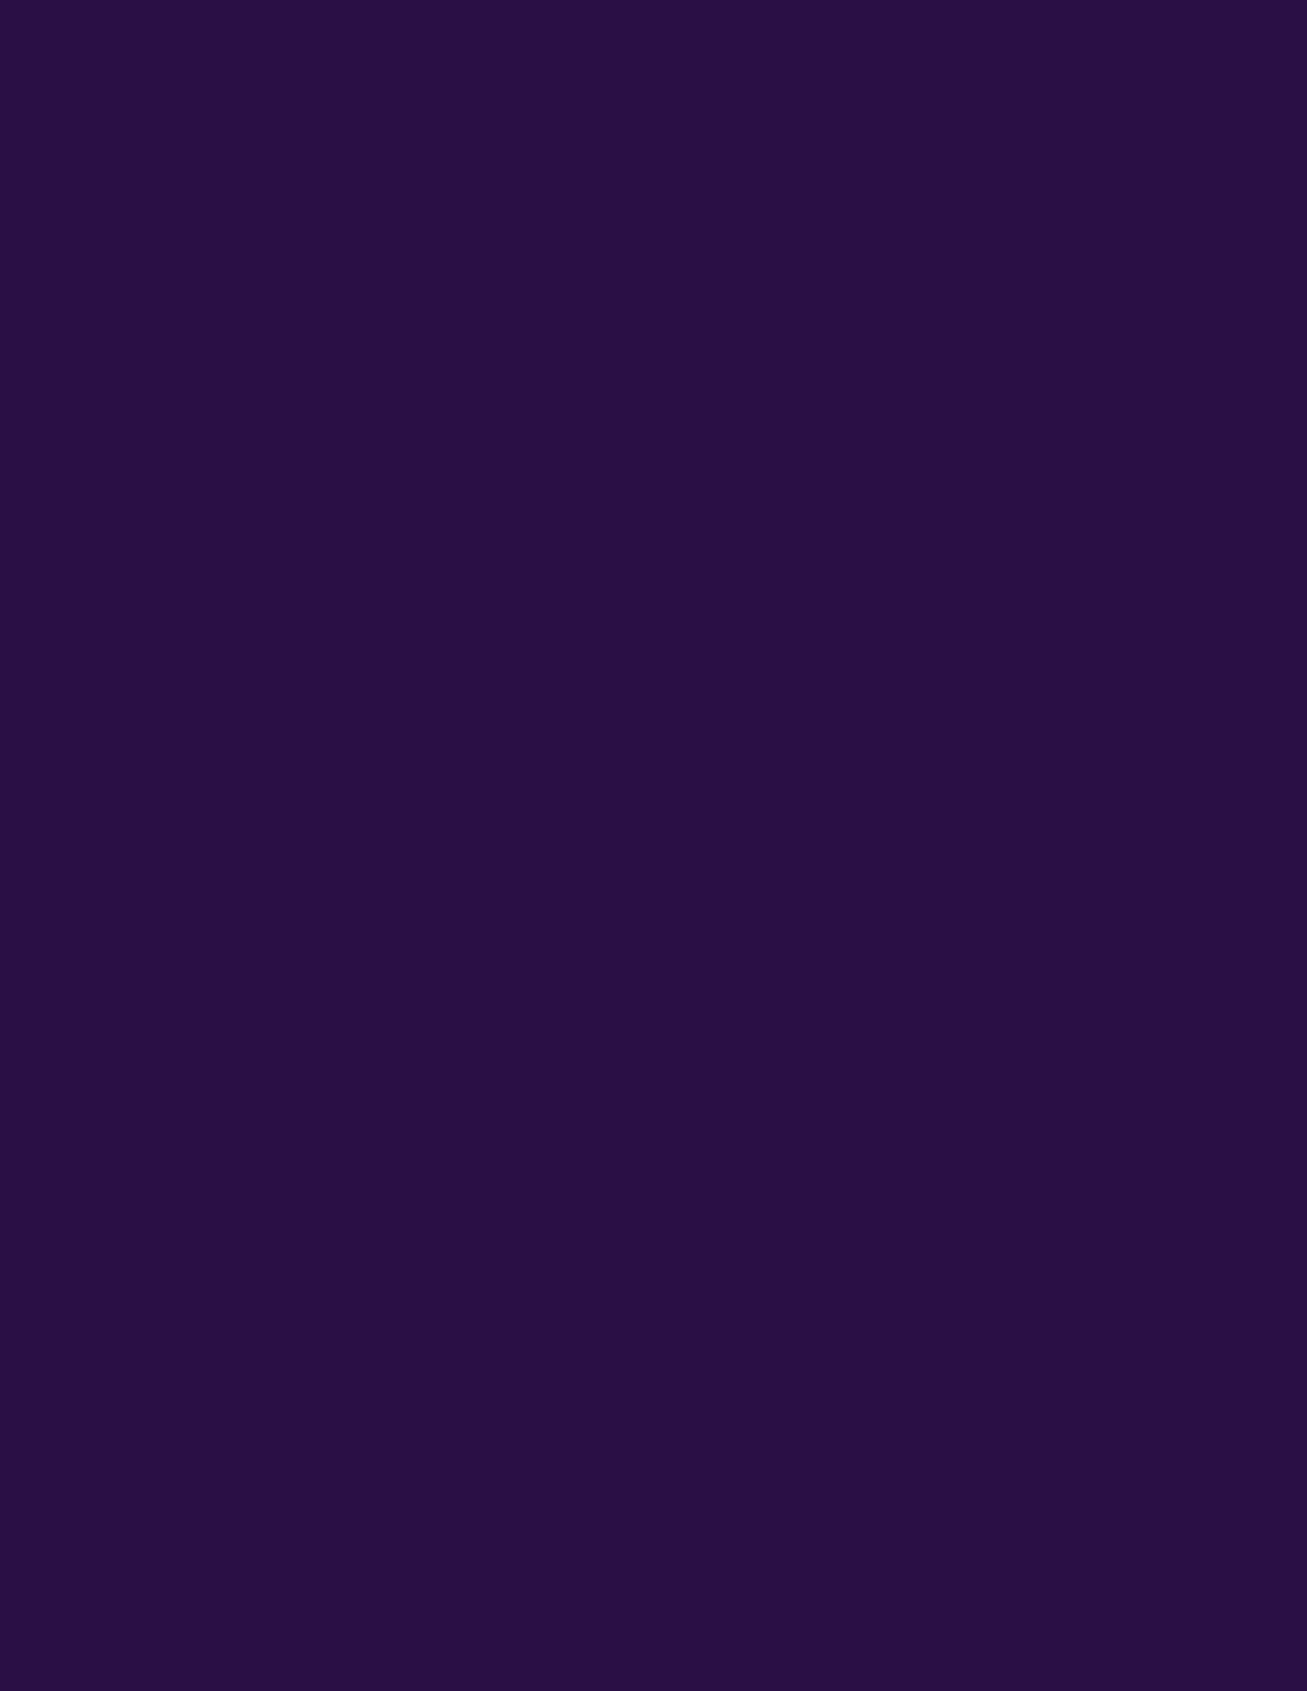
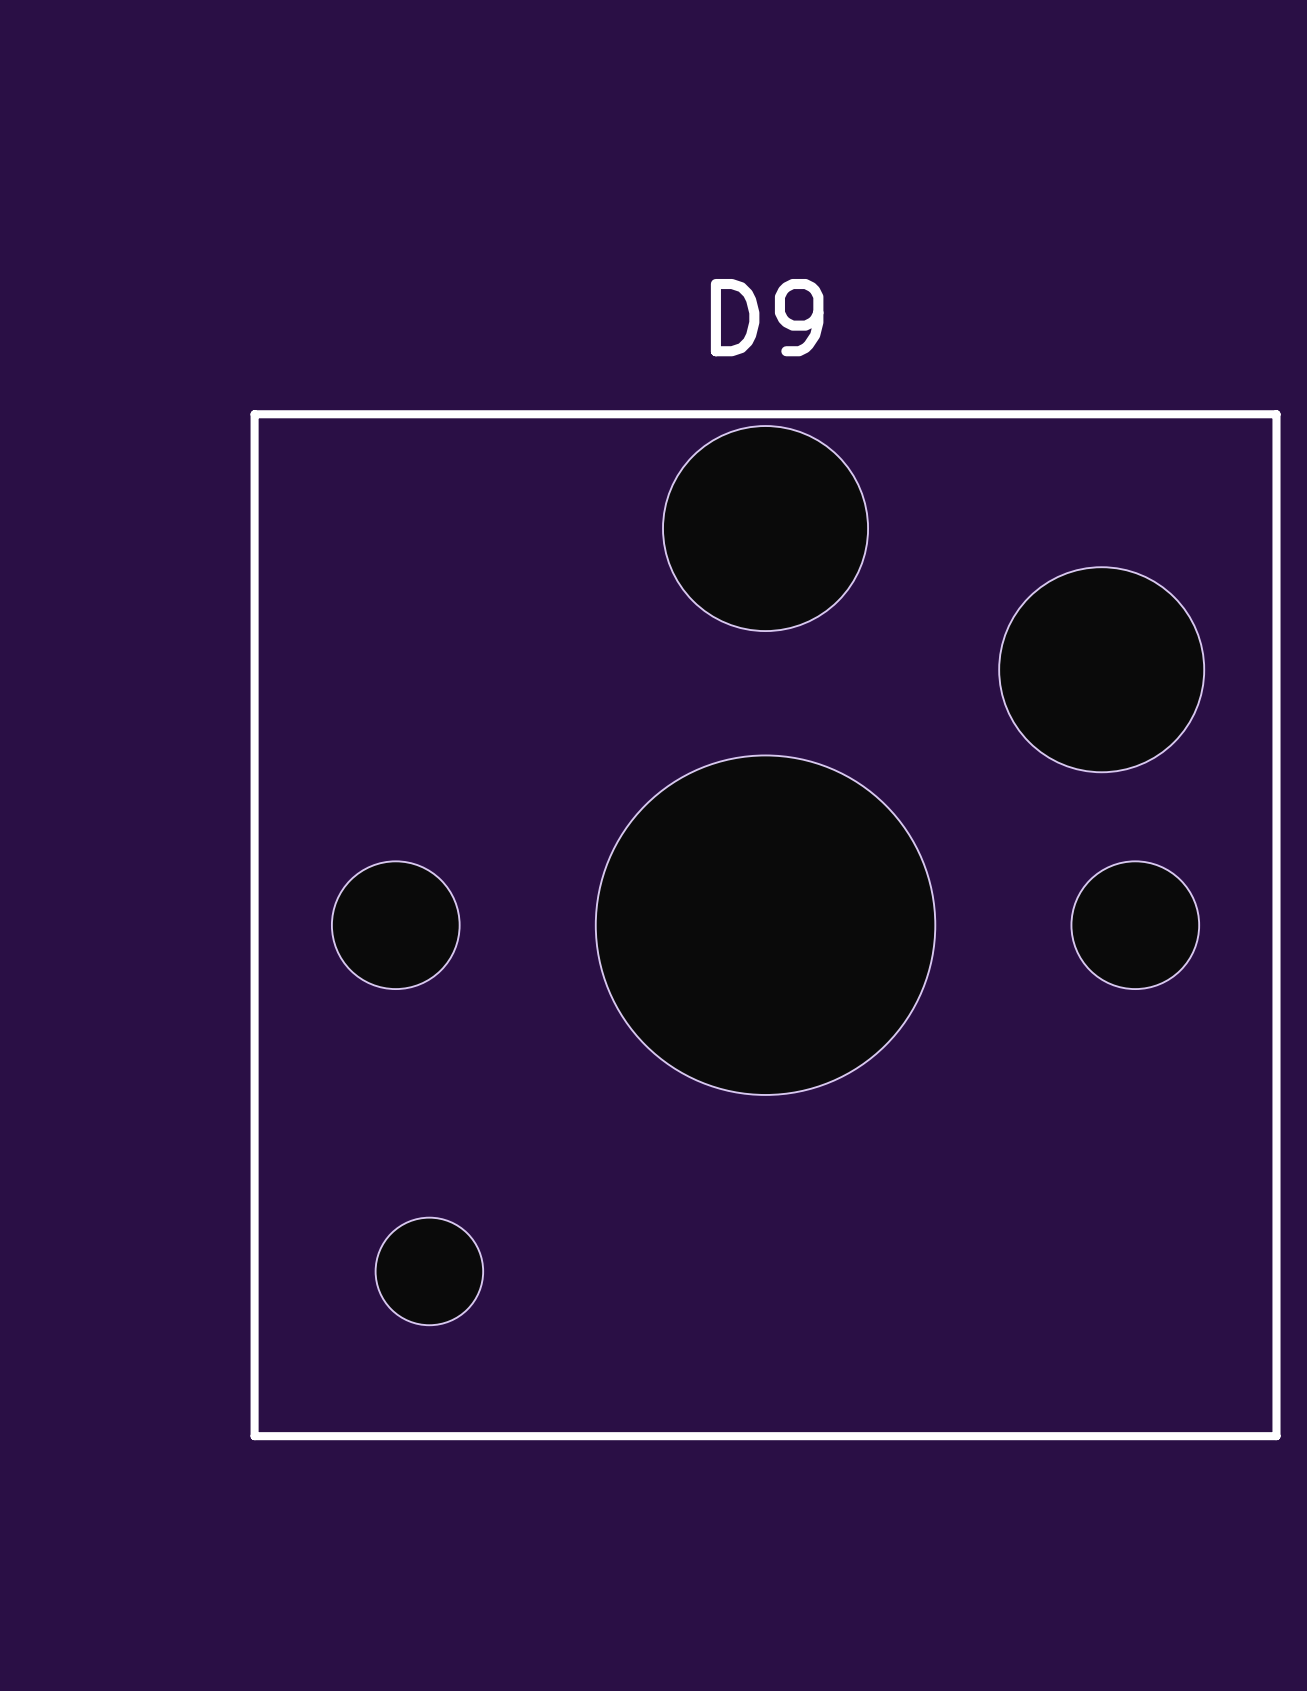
D9: none -> (765, 925)

